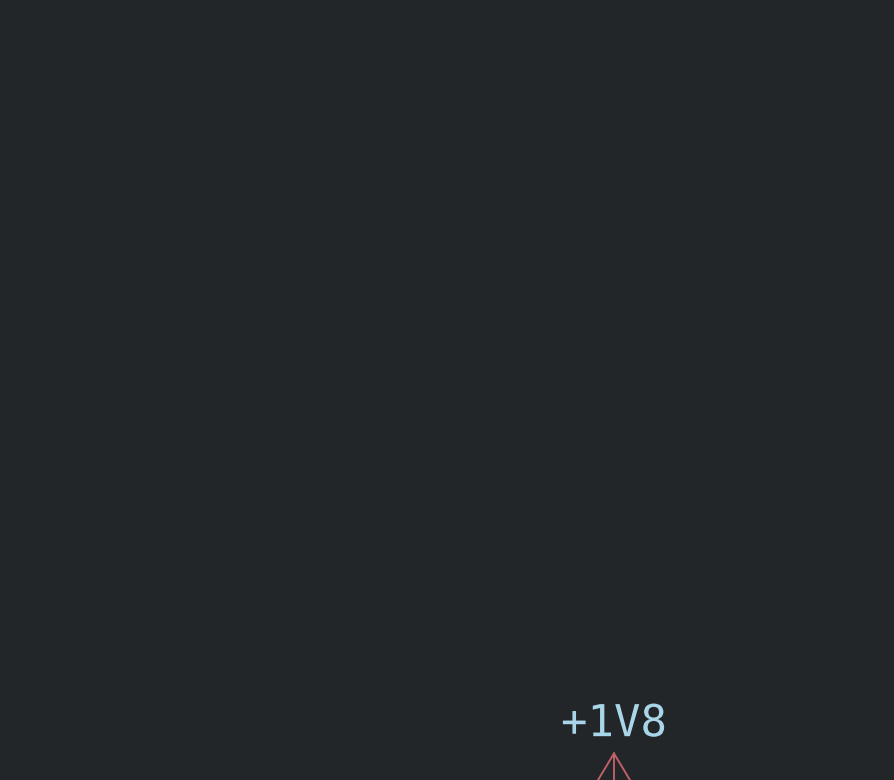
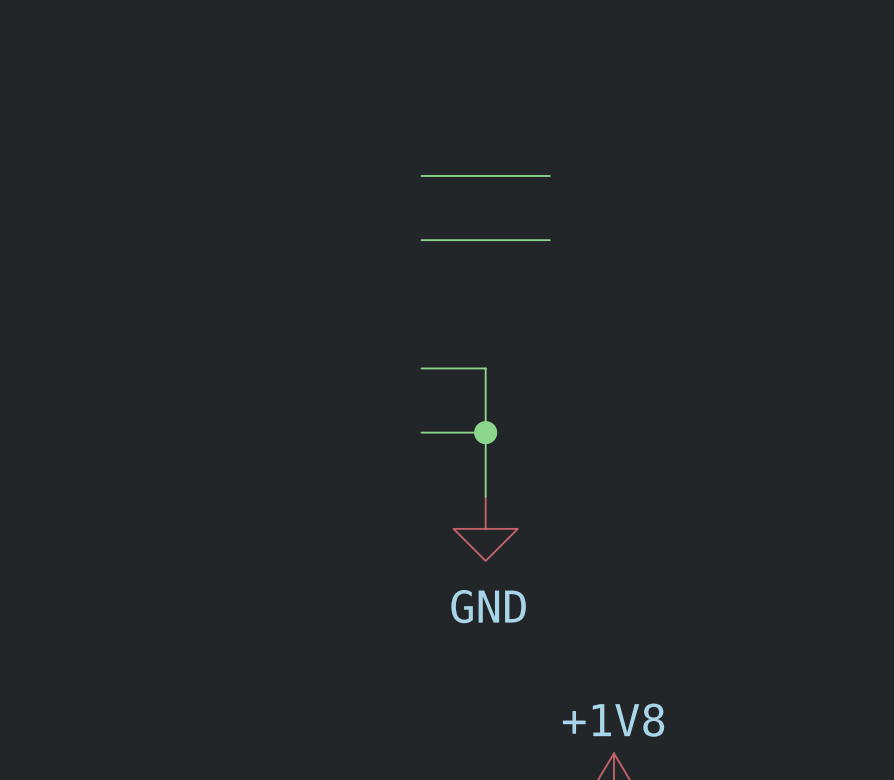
wire: none -> (421, 175) (549, 175)
wire: none -> (421, 240) (549, 240)
wire: none -> (421, 368) (485, 368) (485, 496)
wire: none -> (421, 432) (485, 432)
junction: none -> (485, 432)
power symbol: none -> GND (485, 528)

